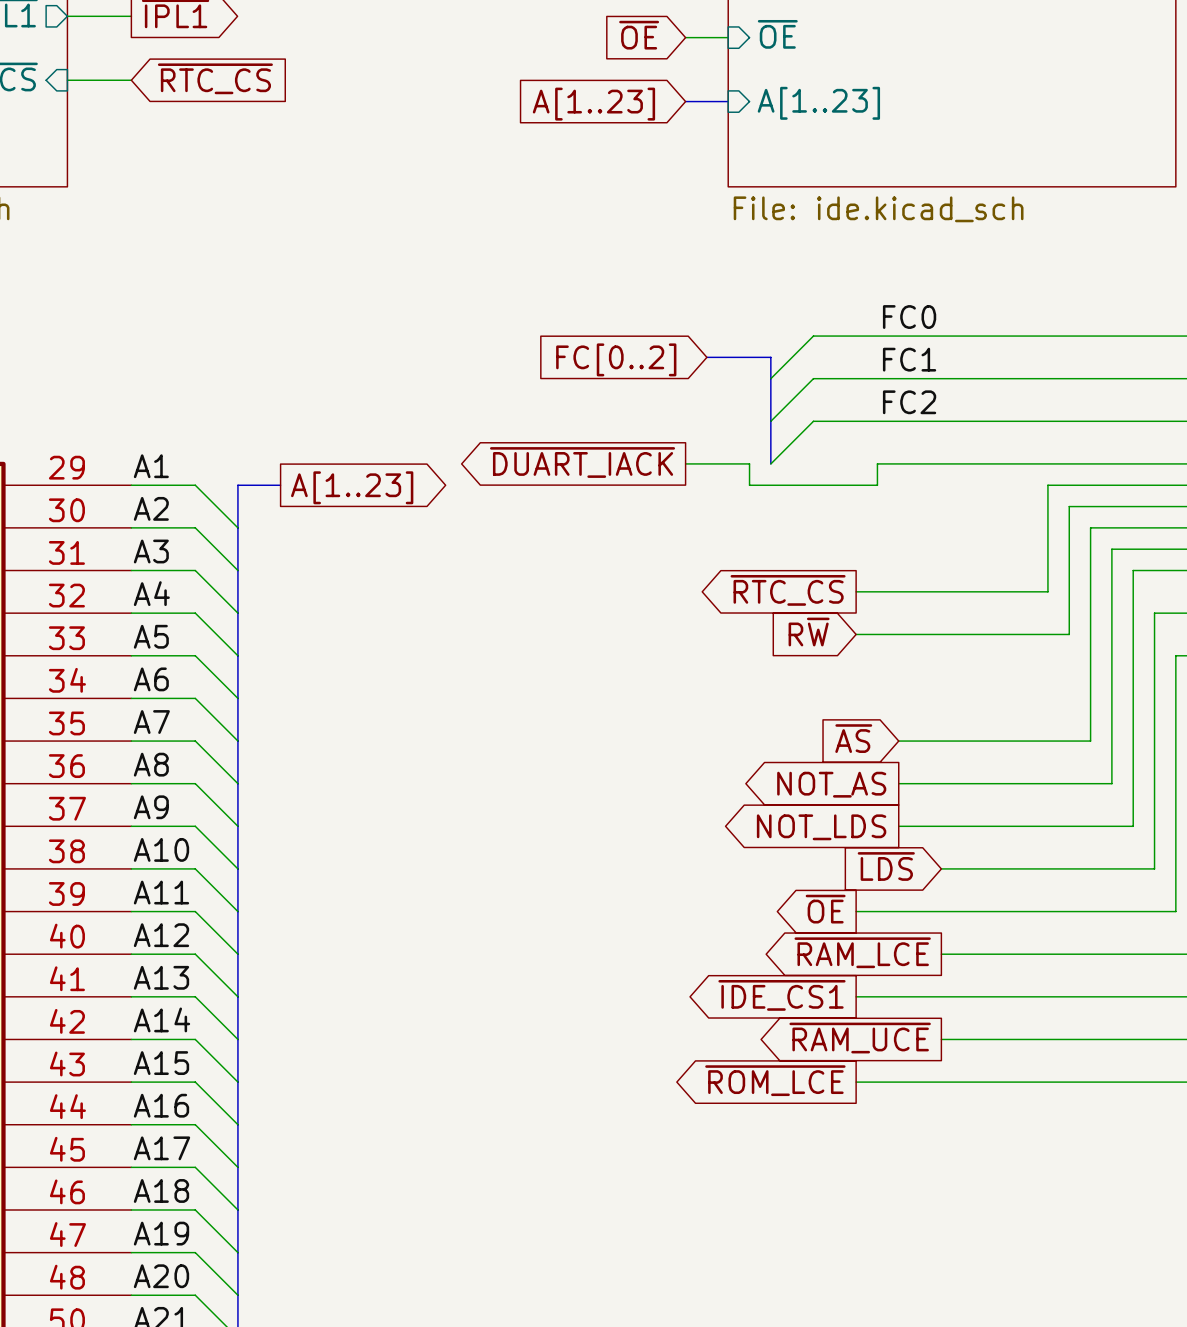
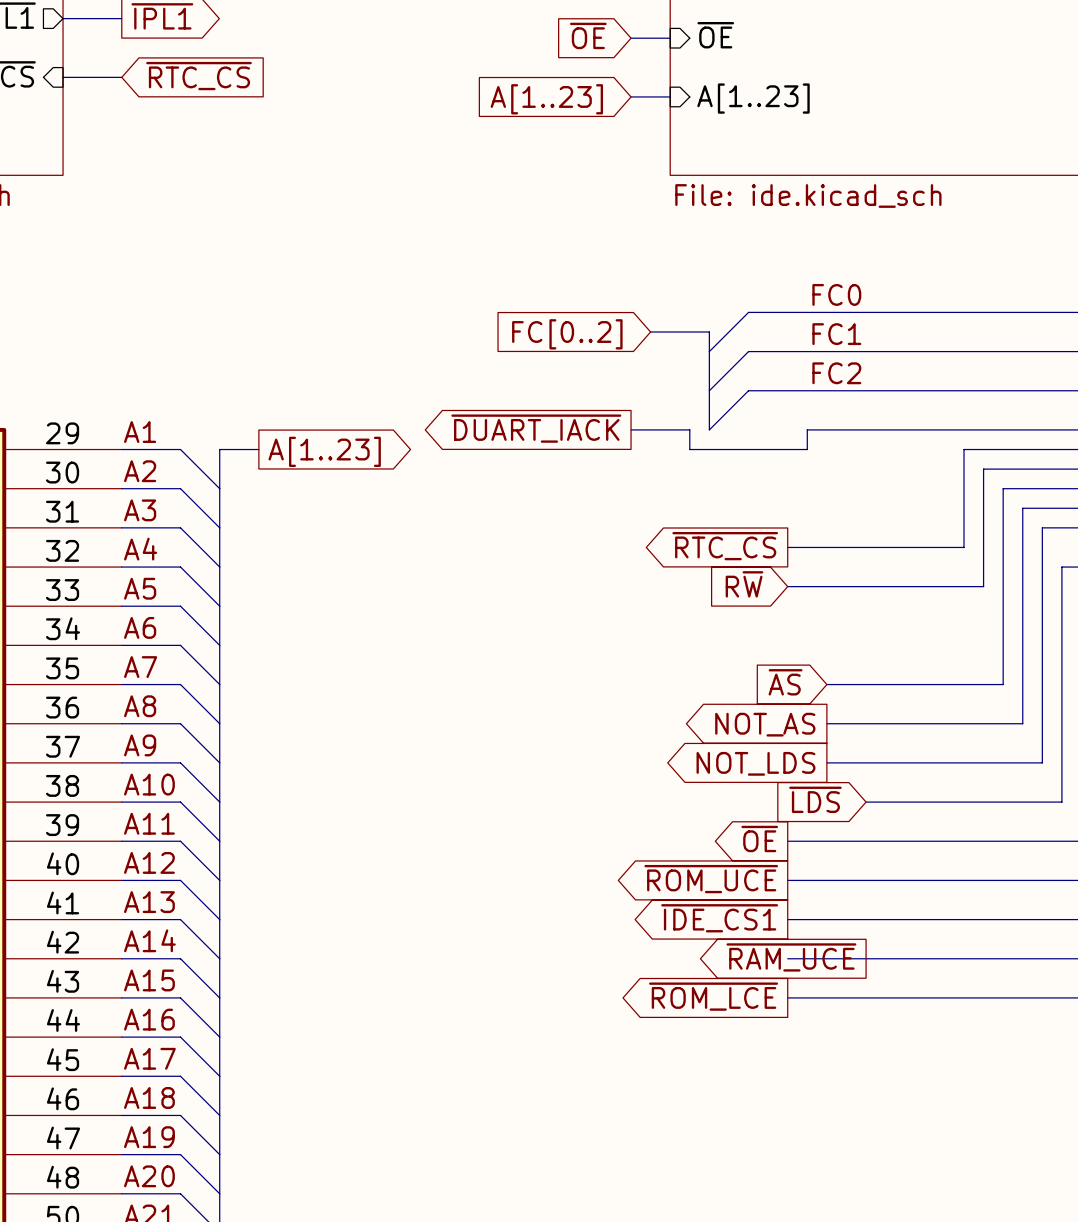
global label: ~{RAM_LCE} (862, 952) -> ~{ROM_UCE} (711, 879)
wire: none -> (787, 880) (866, 880)
wire: none -> (787, 958) (866, 958)

